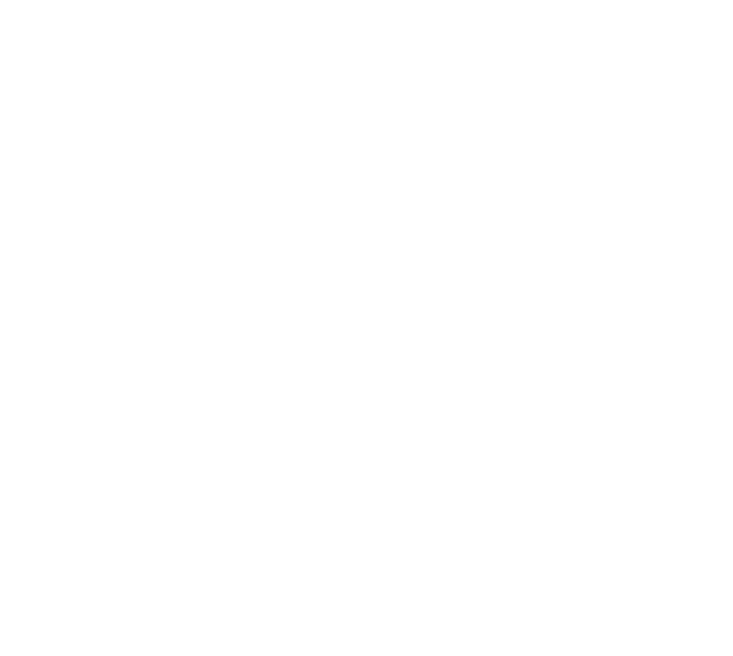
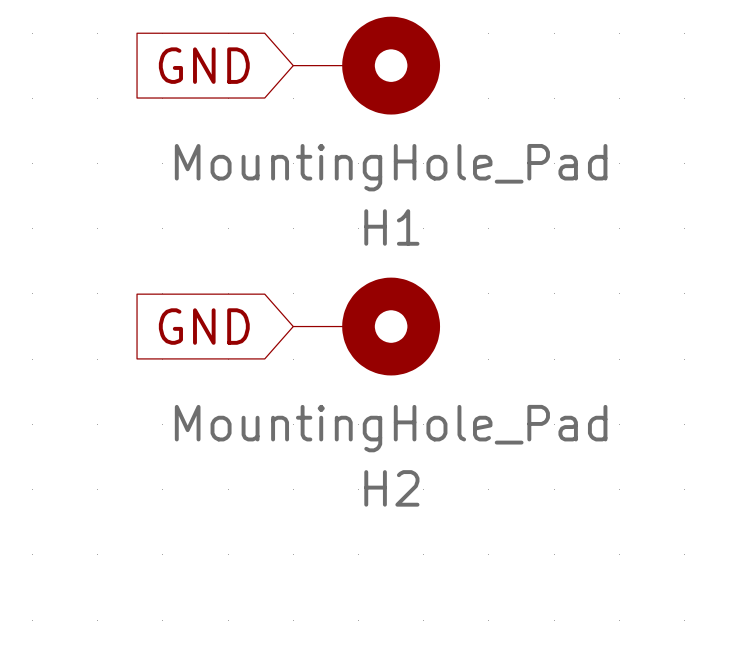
global label: none -> GND (204, 65)
H1: none -> MountingHole_Pad (366, 65)
global label: none -> GND (204, 326)
H2: none -> MountingHole_Pad (366, 326)

